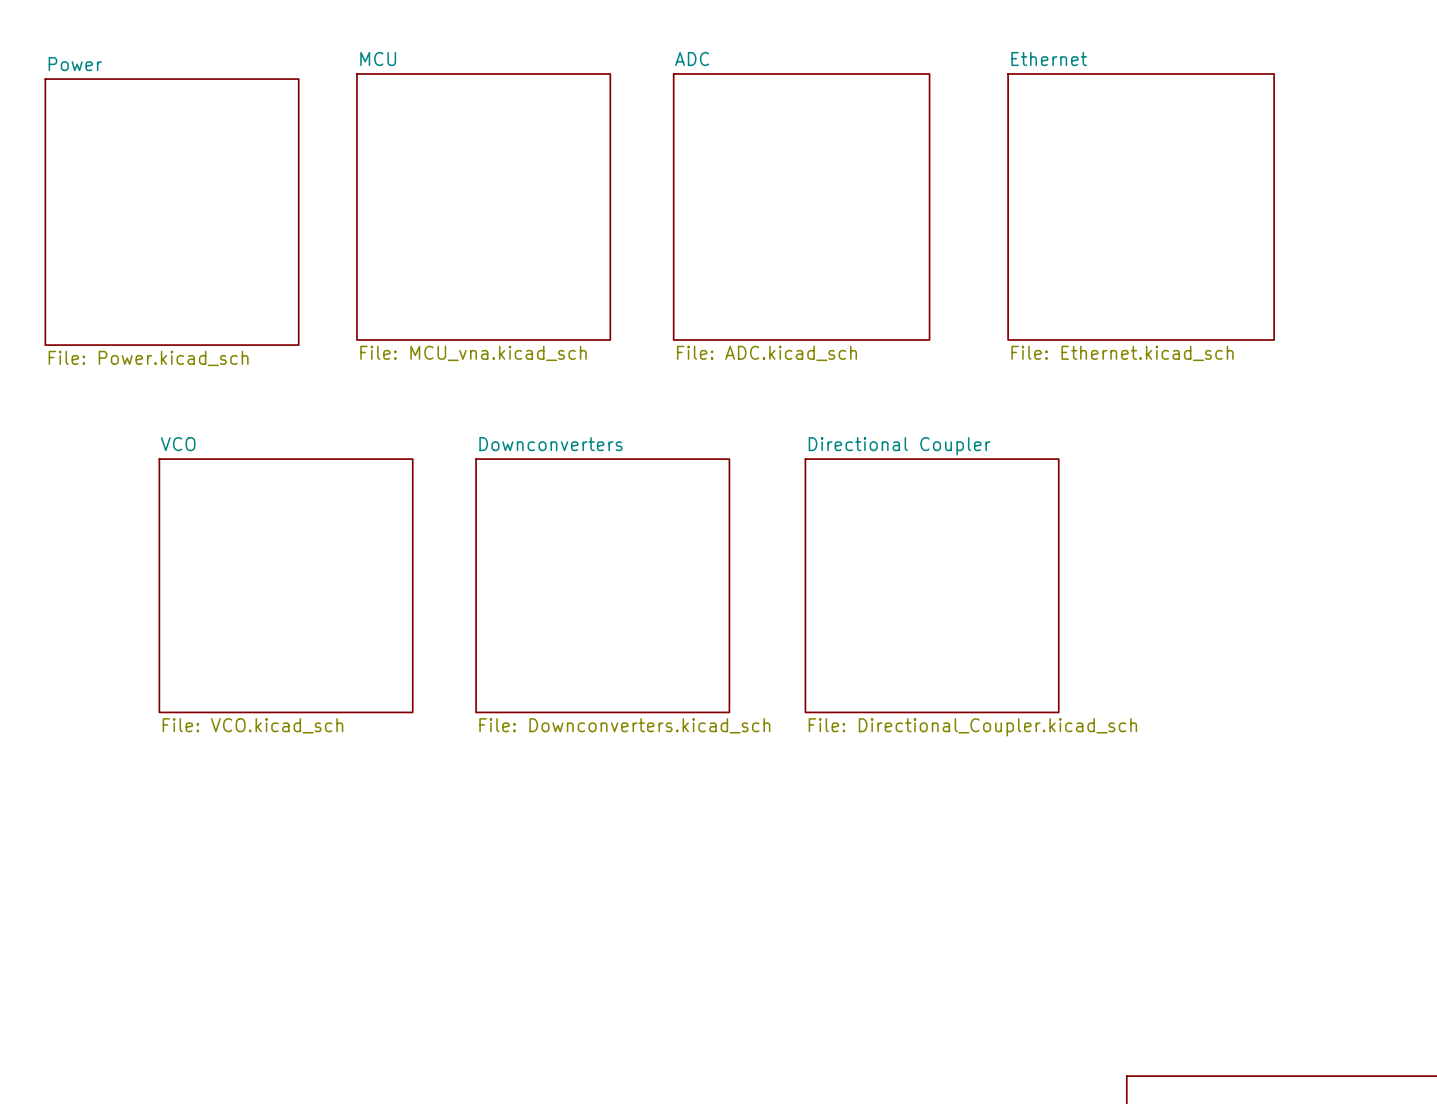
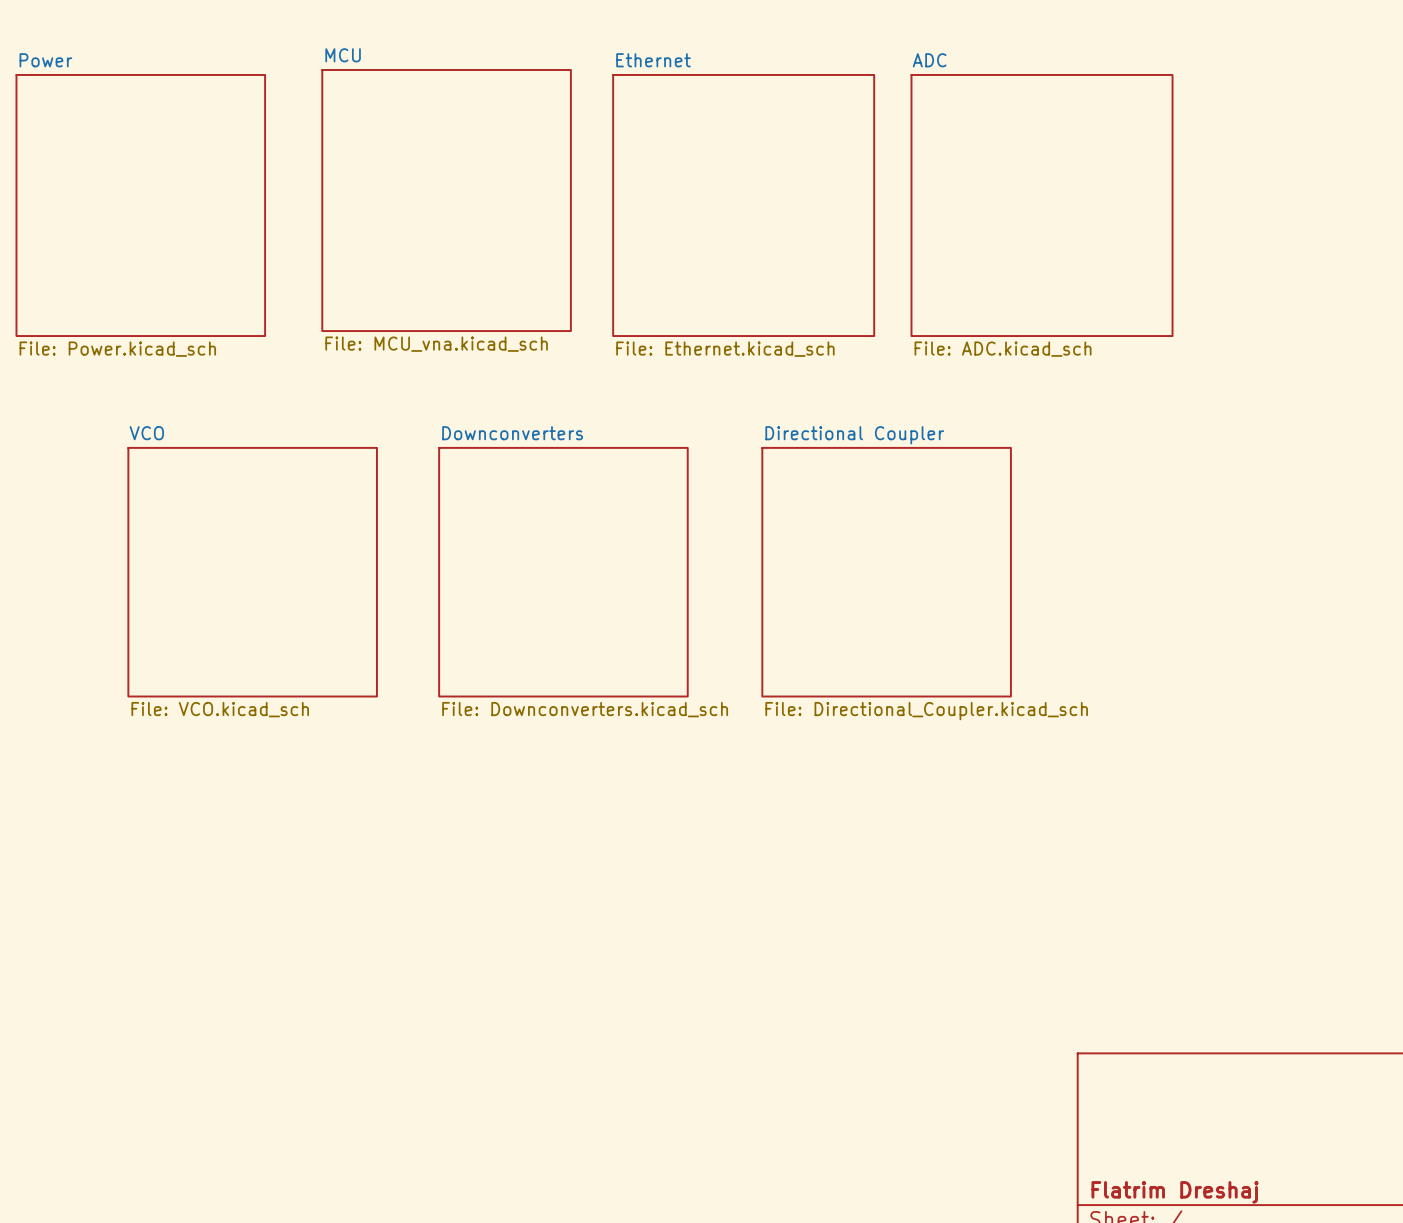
sheet ADC: File: ADC.kicad_sch (801, 206) -> none
sheet Ethernet: File: Ethernet.kicad_sch (1141, 206) -> none
sheet Ethernet: none -> File: Ethernet.kicad_sch (743, 205)
sheet ADC: none -> File: ADC.kicad_sch (1042, 205)

